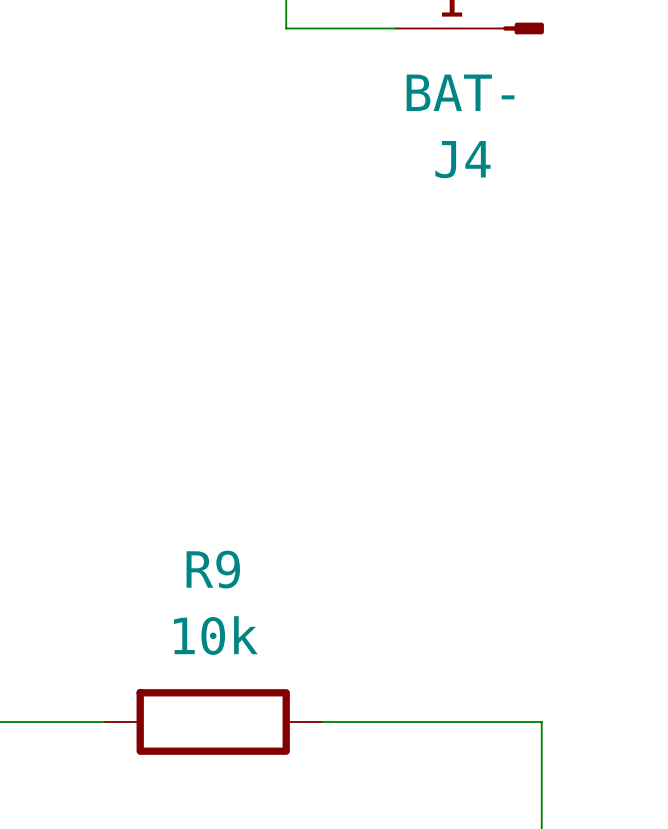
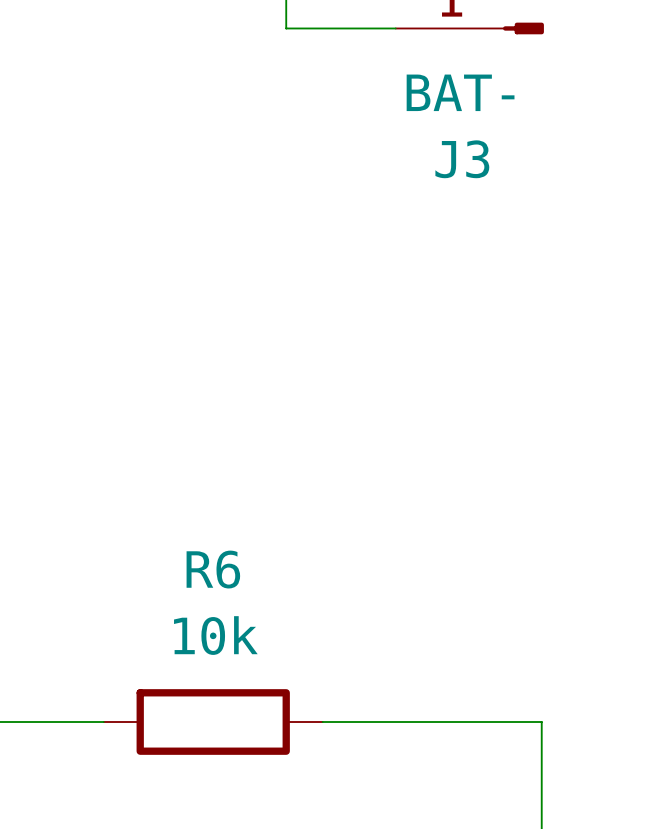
J4 name: J4 (463, 159) -> J3 (462, 159)
R9 name: R9 (213, 569) -> R6 (213, 569)

